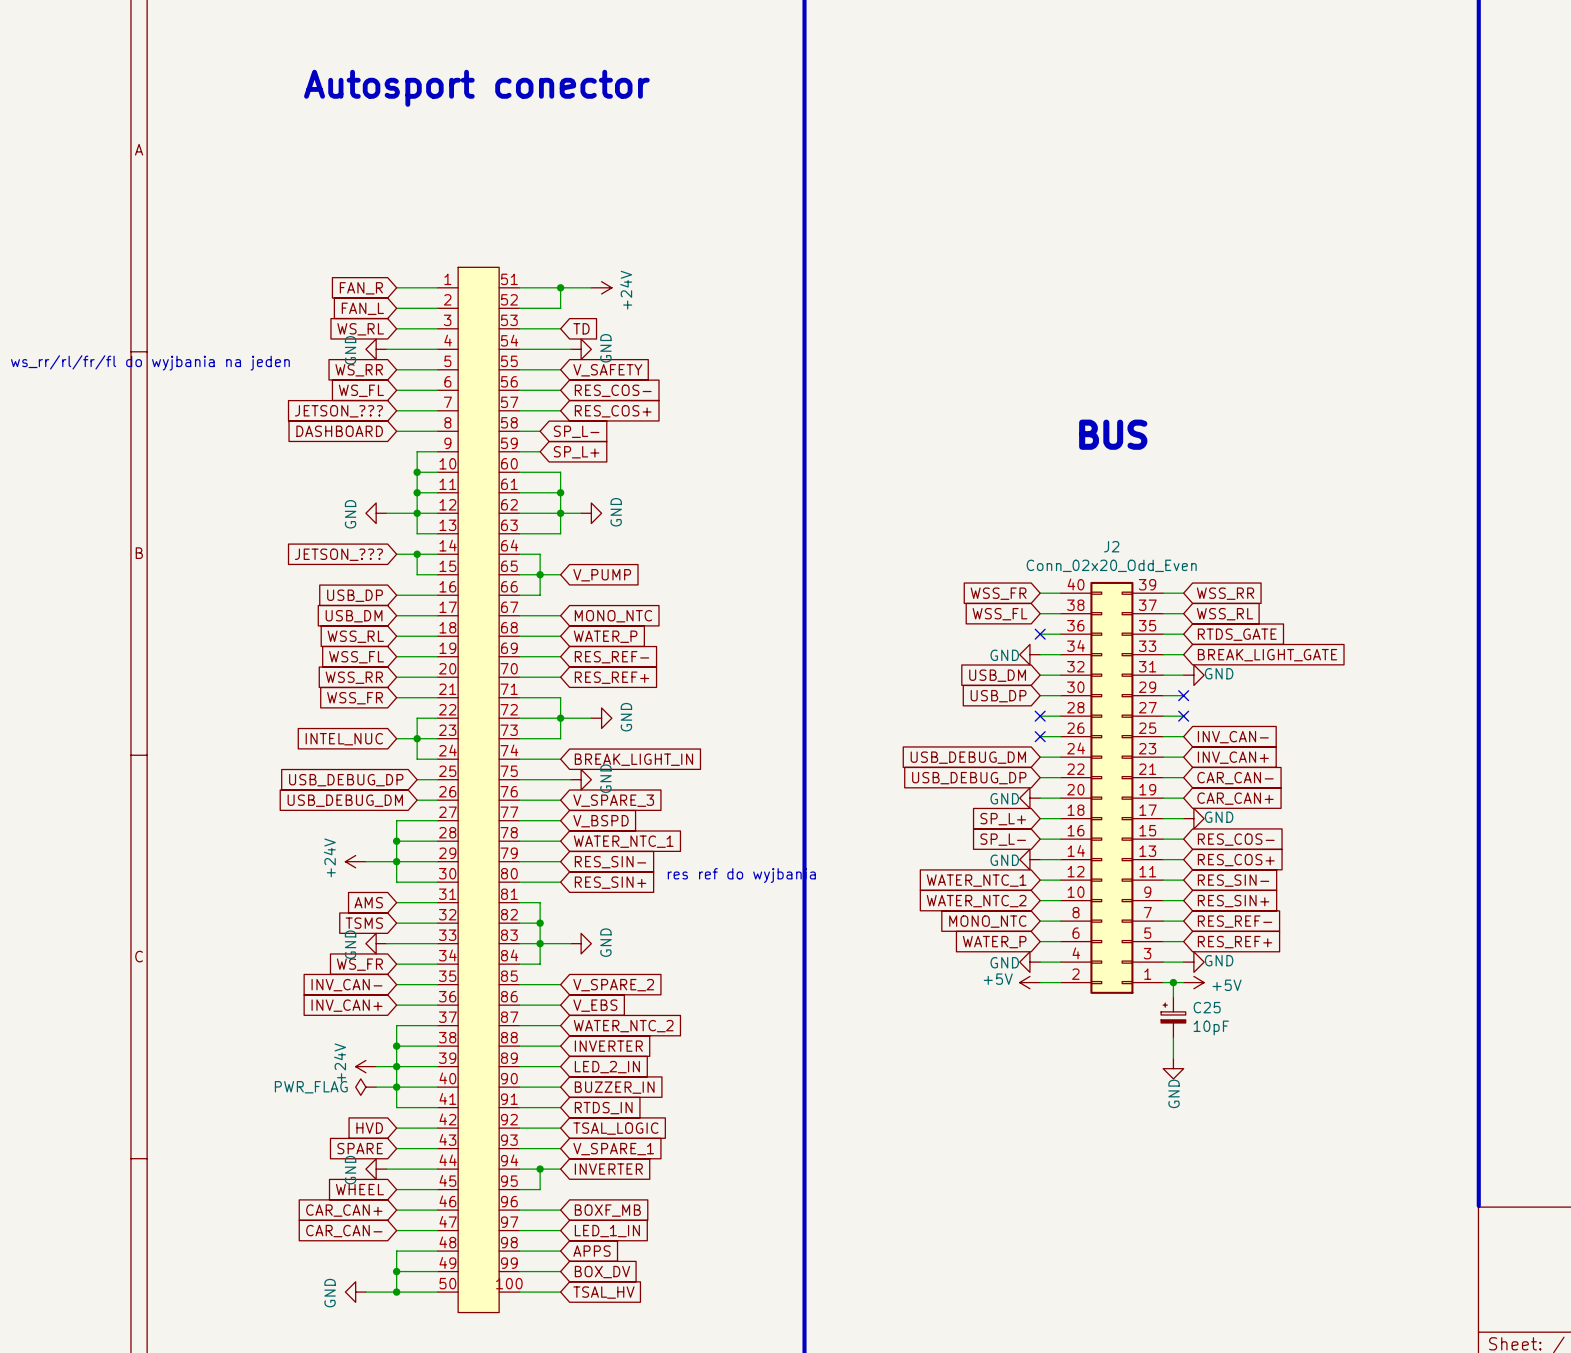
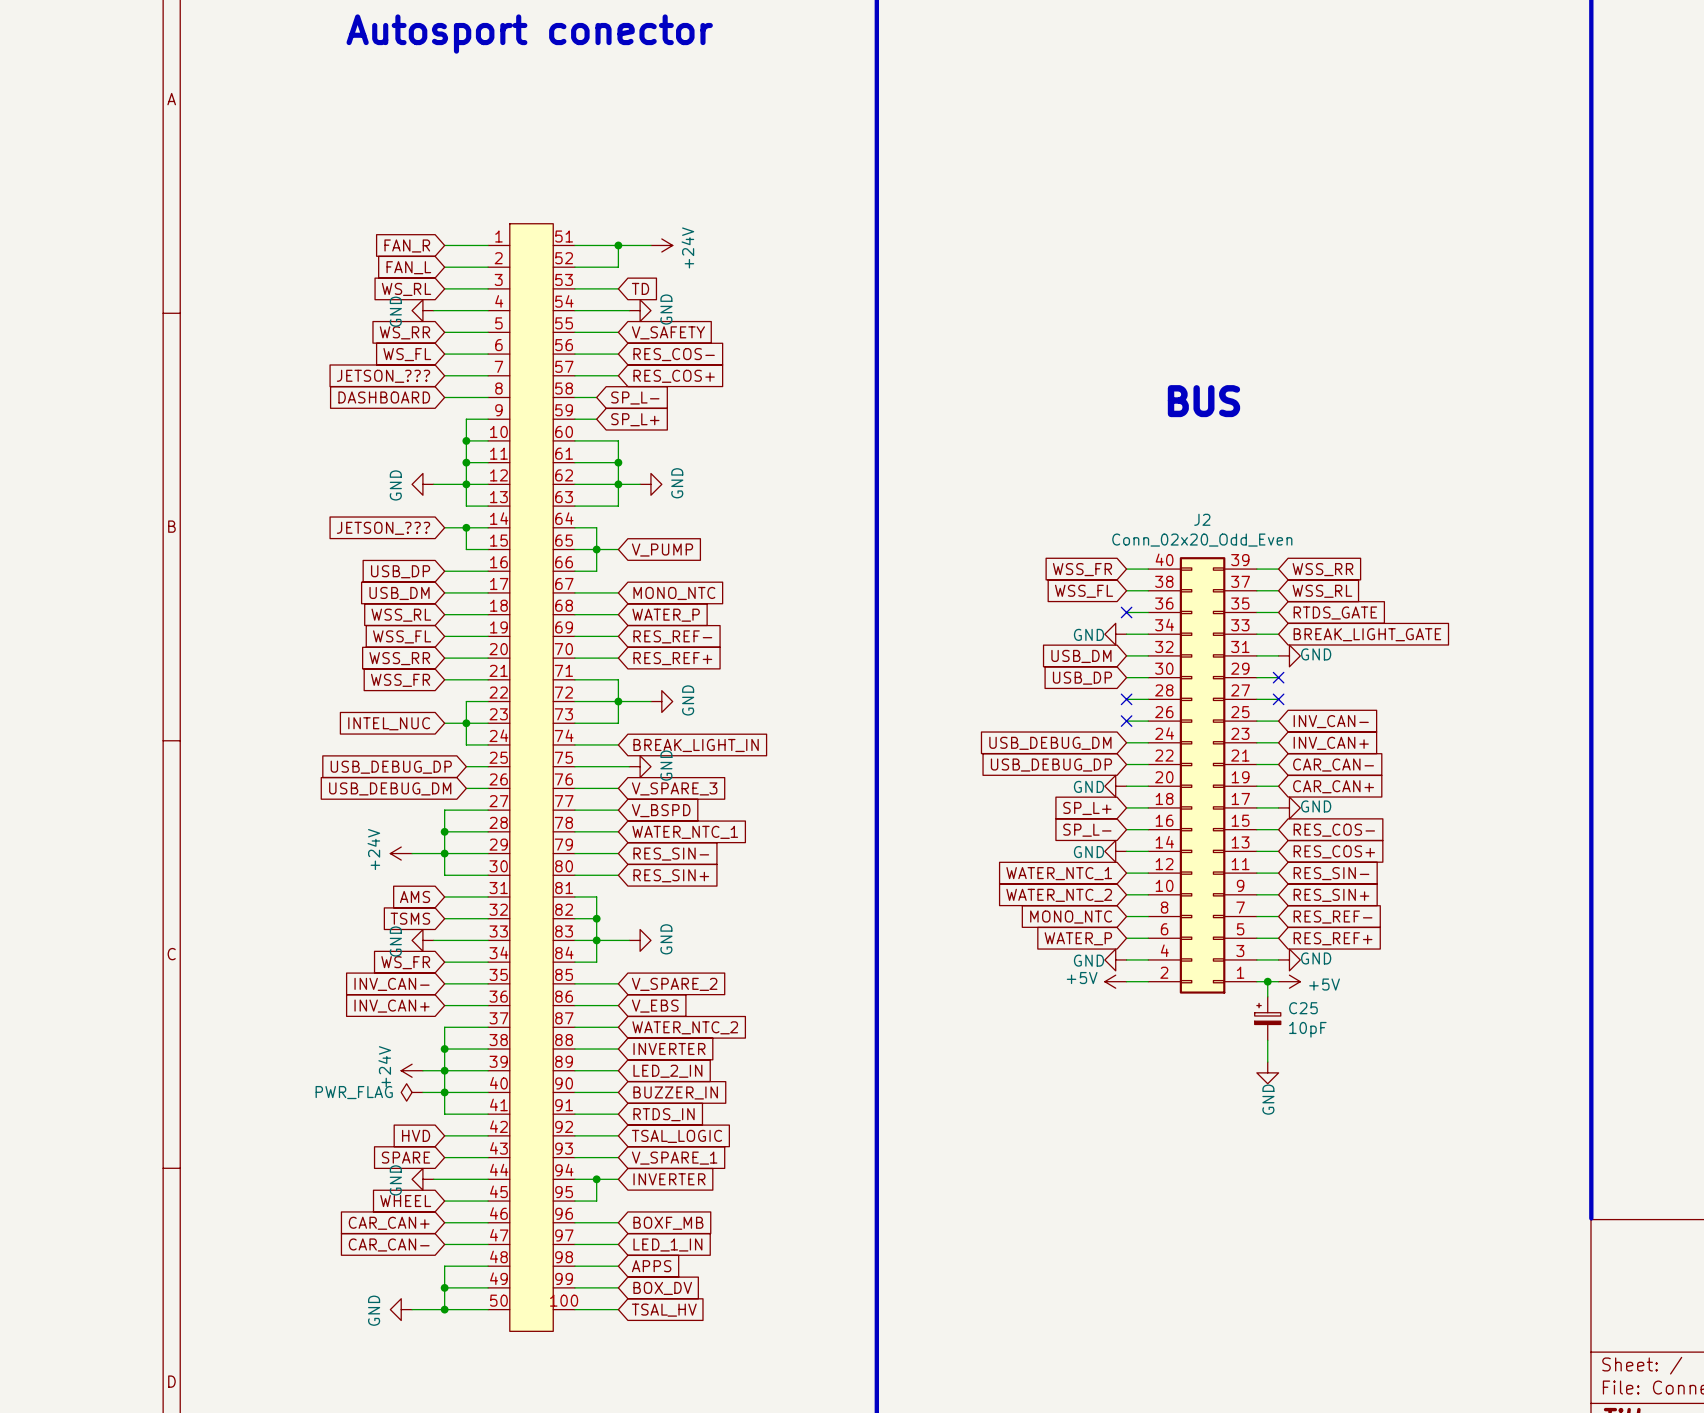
text: ws_rr/rl/fr/fl do wyjbania na jeden (150, 362) -> none
text: res ref do wyjbania (741, 875) -> none

